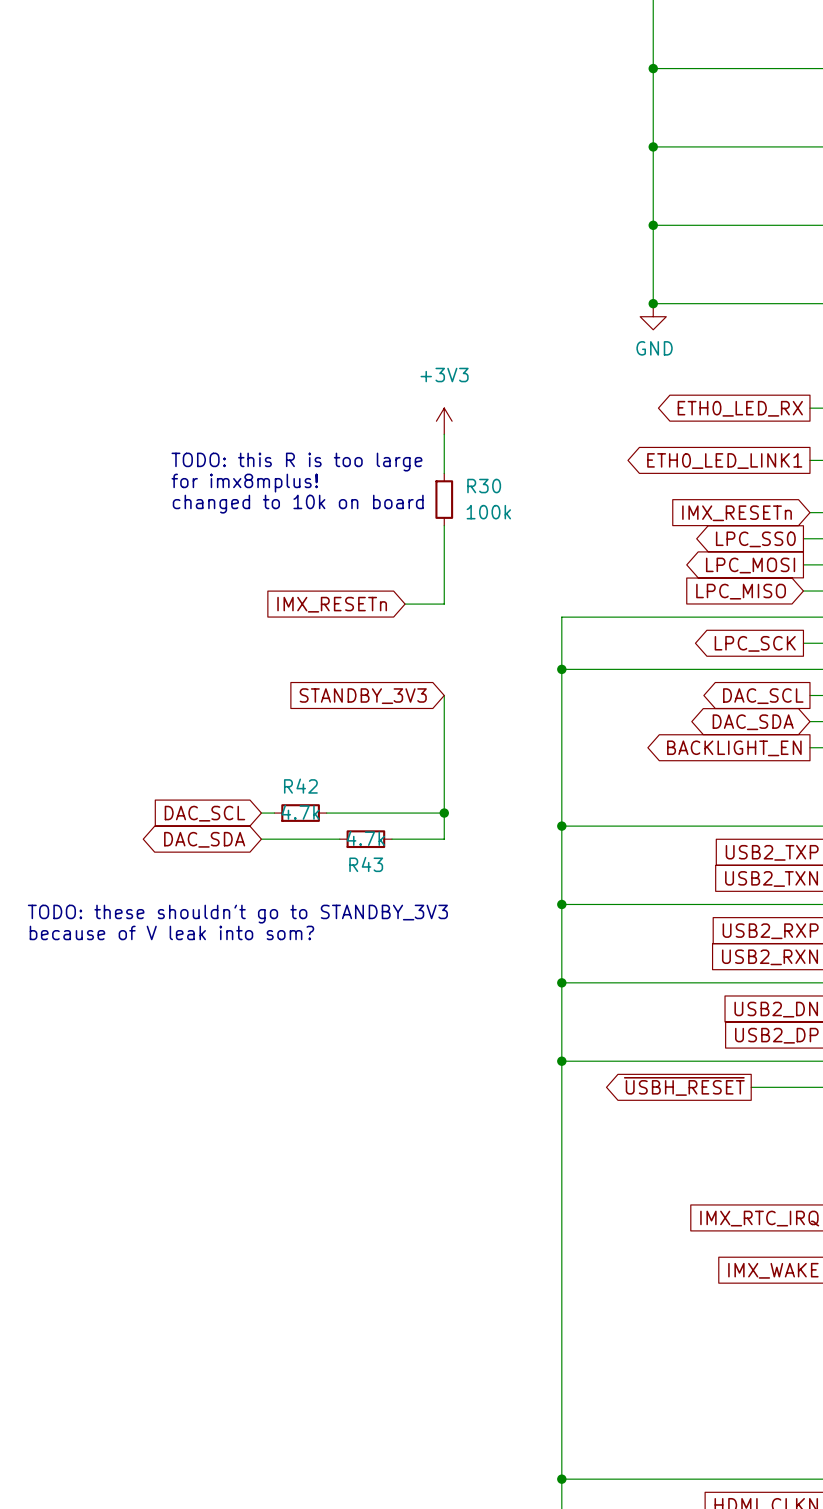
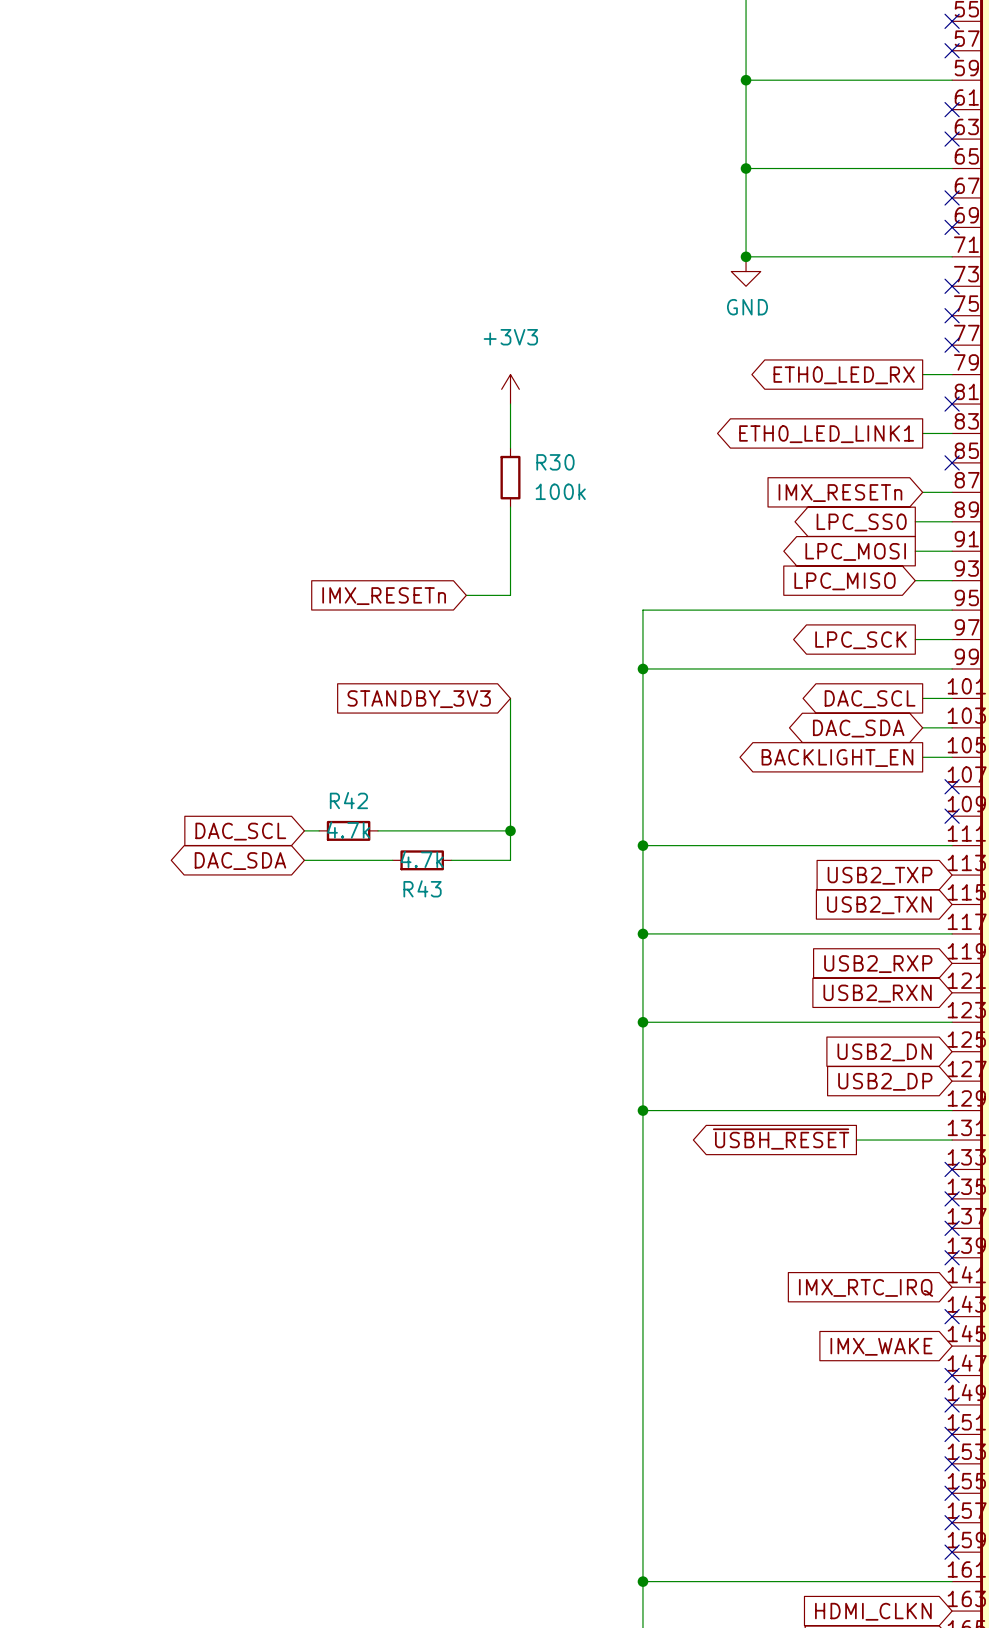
text: TODO: this R is too large (296, 462) -> none
text: for imx8mplus! (244, 483) -> none
text: changed to 10k on board (298, 504) -> none
text: TODO: these shouldn't go to STANDBY_3V3 (237, 914) -> none
text: because of V leak into som? (171, 932) -> none

